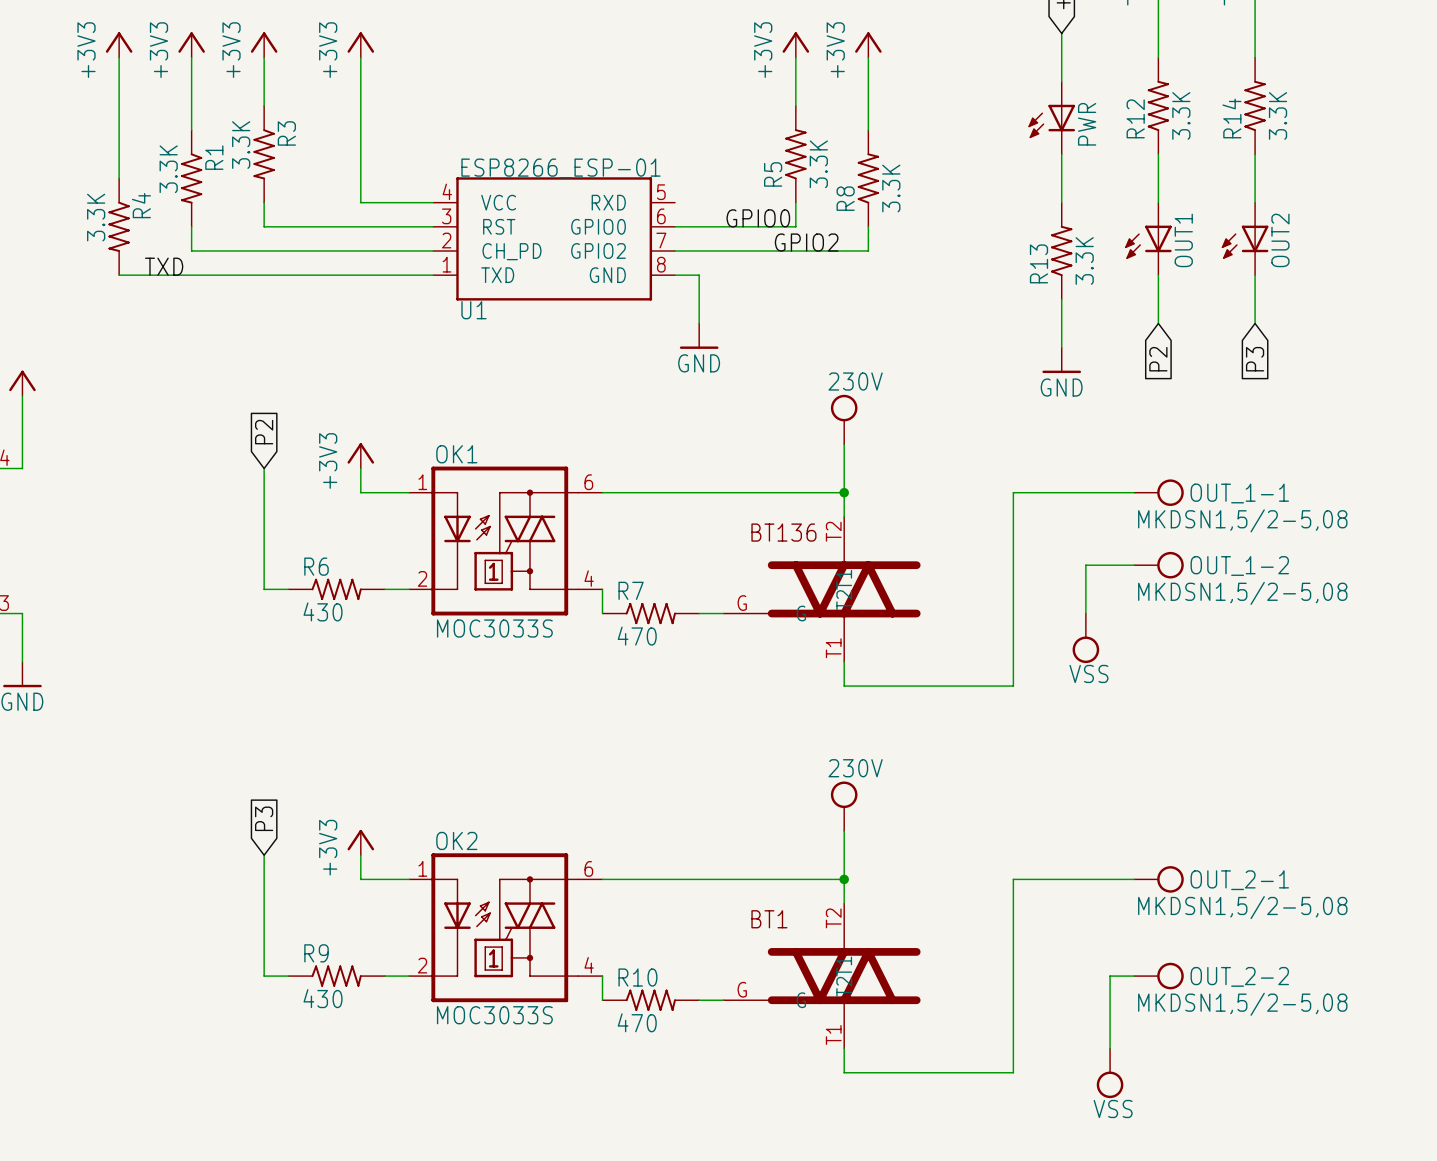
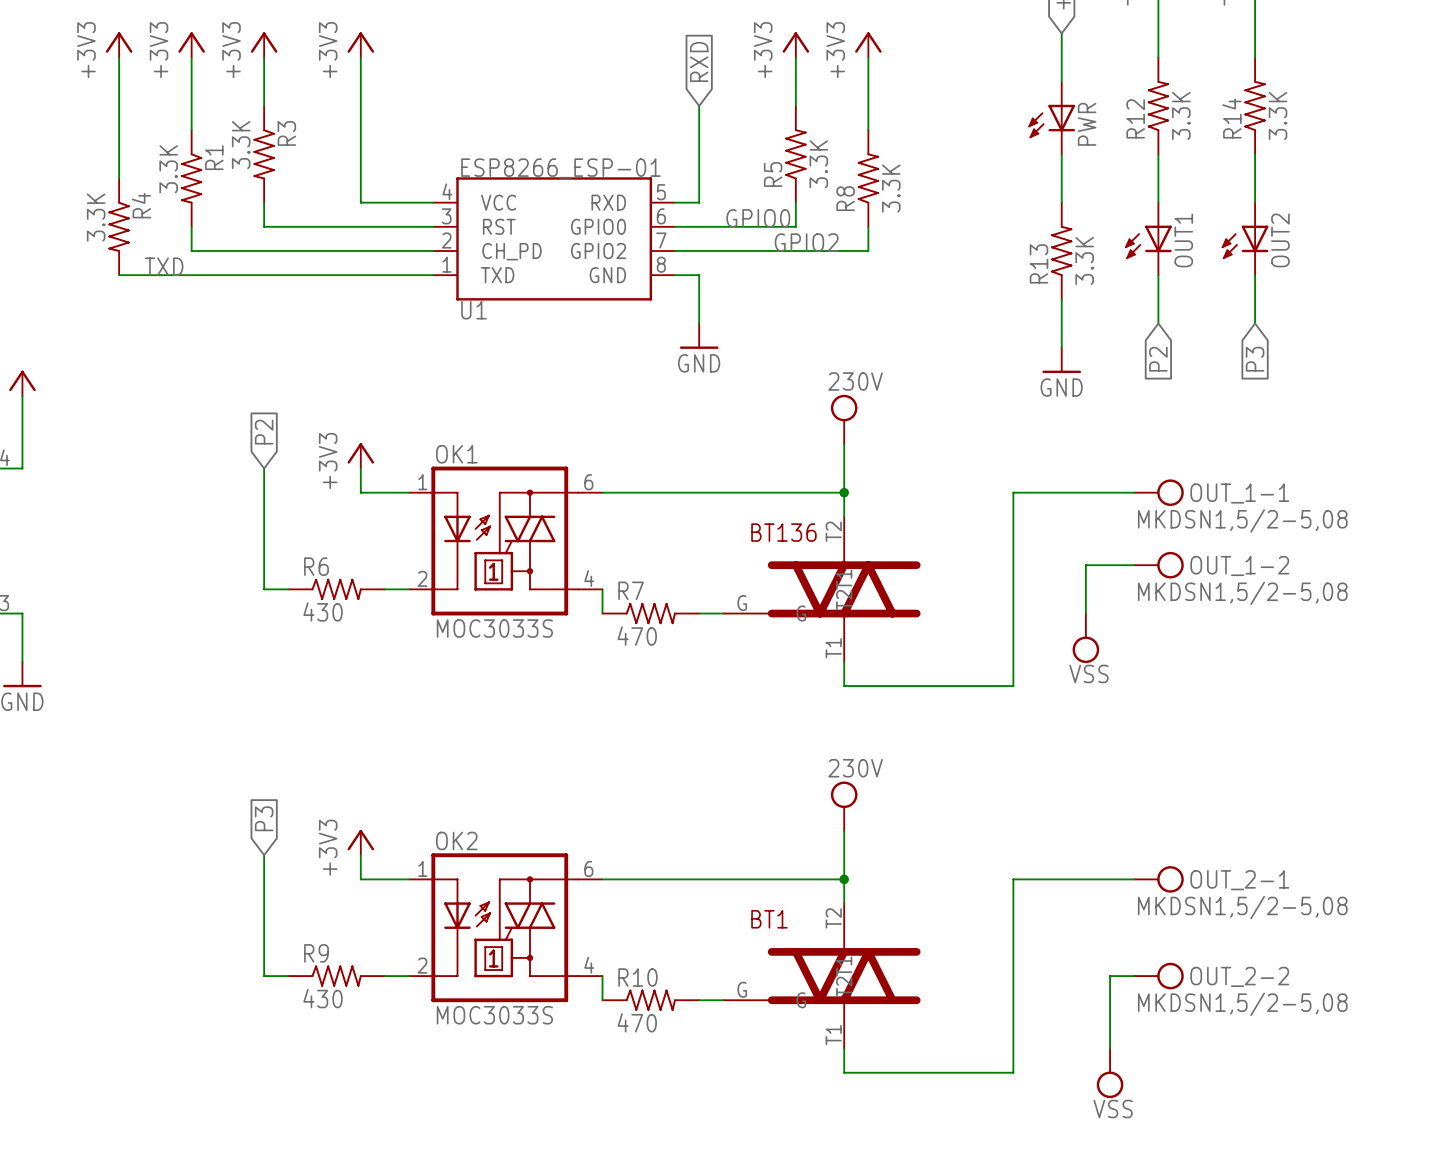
global label: none -> RXD (699, 61)
wire: none -> (699, 105) (699, 202) (675, 202)

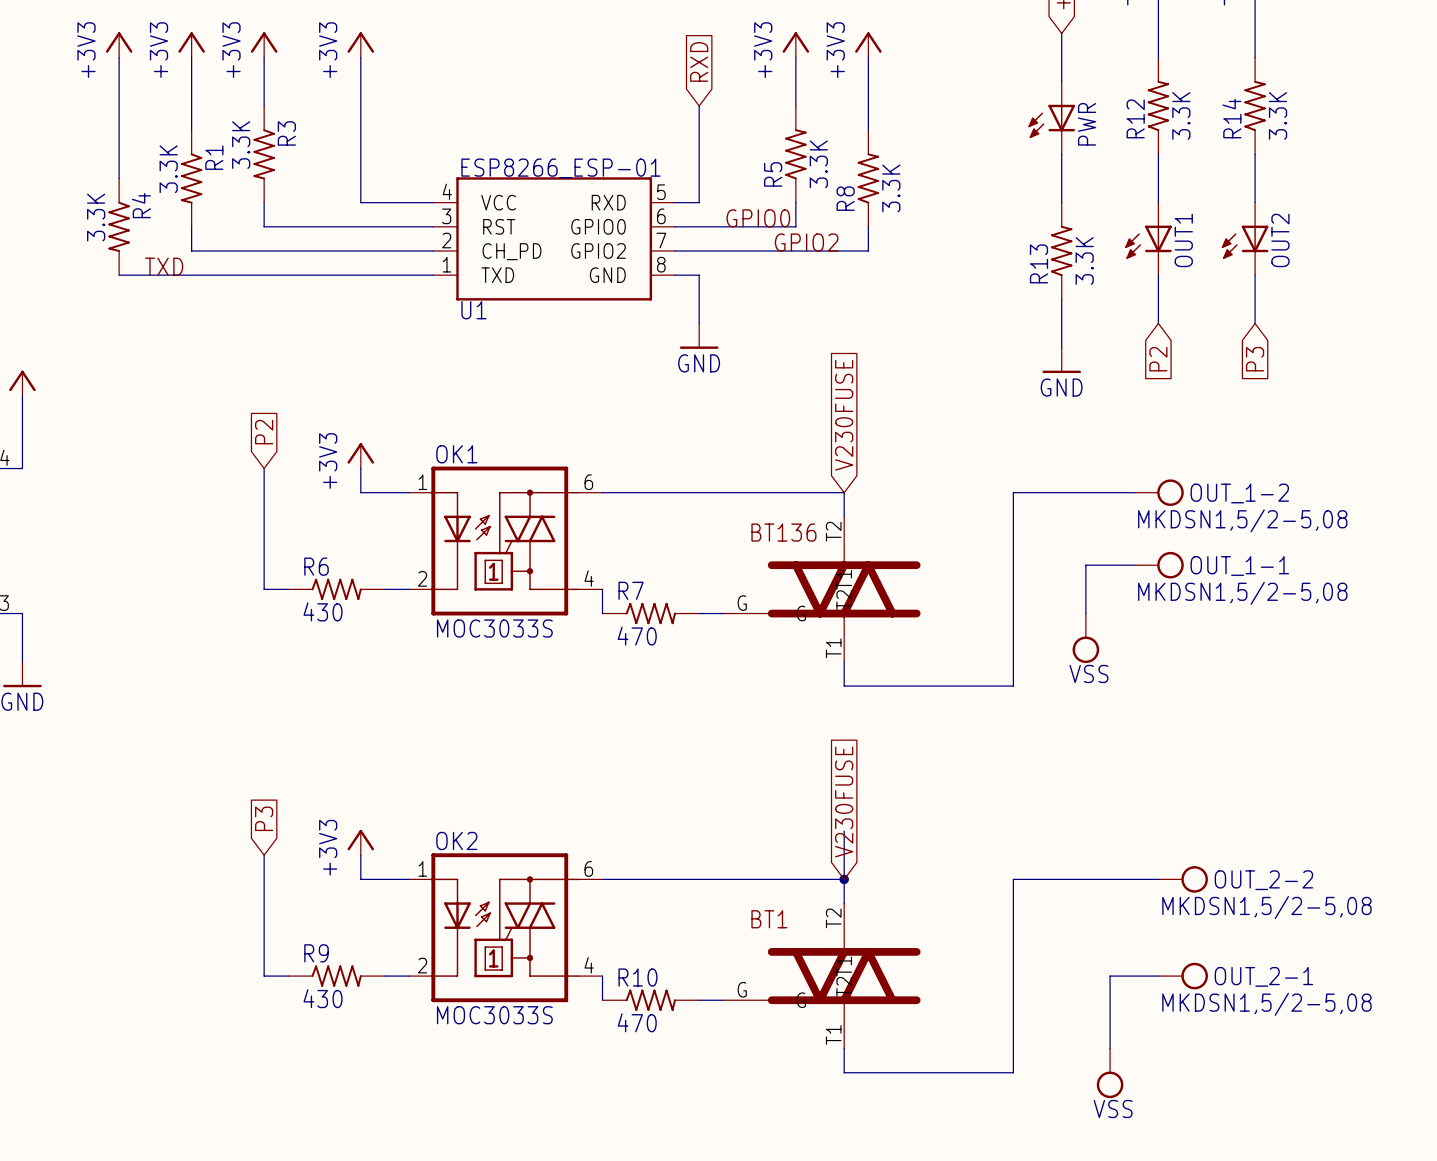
global label: none -> V230FUSE (844, 415)
power symbol: 230V (844, 419) -> none
wire: (844, 444) (844, 492) -> none
junction: (844, 492) -> none
OUT_1-1 name: OUT_1-1 (1239, 493) -> OUT_1-2 (1239, 493)
OUT_1-2 name: OUT_1-2 (1239, 566) -> OUT_1-1 (1239, 566)
global label: none -> V230FUSE (844, 802)
power symbol: 230V (844, 806) -> none
OUT_2-1 position: (1158, 879) -> (1183, 976)
OUT_2-2 position: (1158, 976) -> (1183, 879)

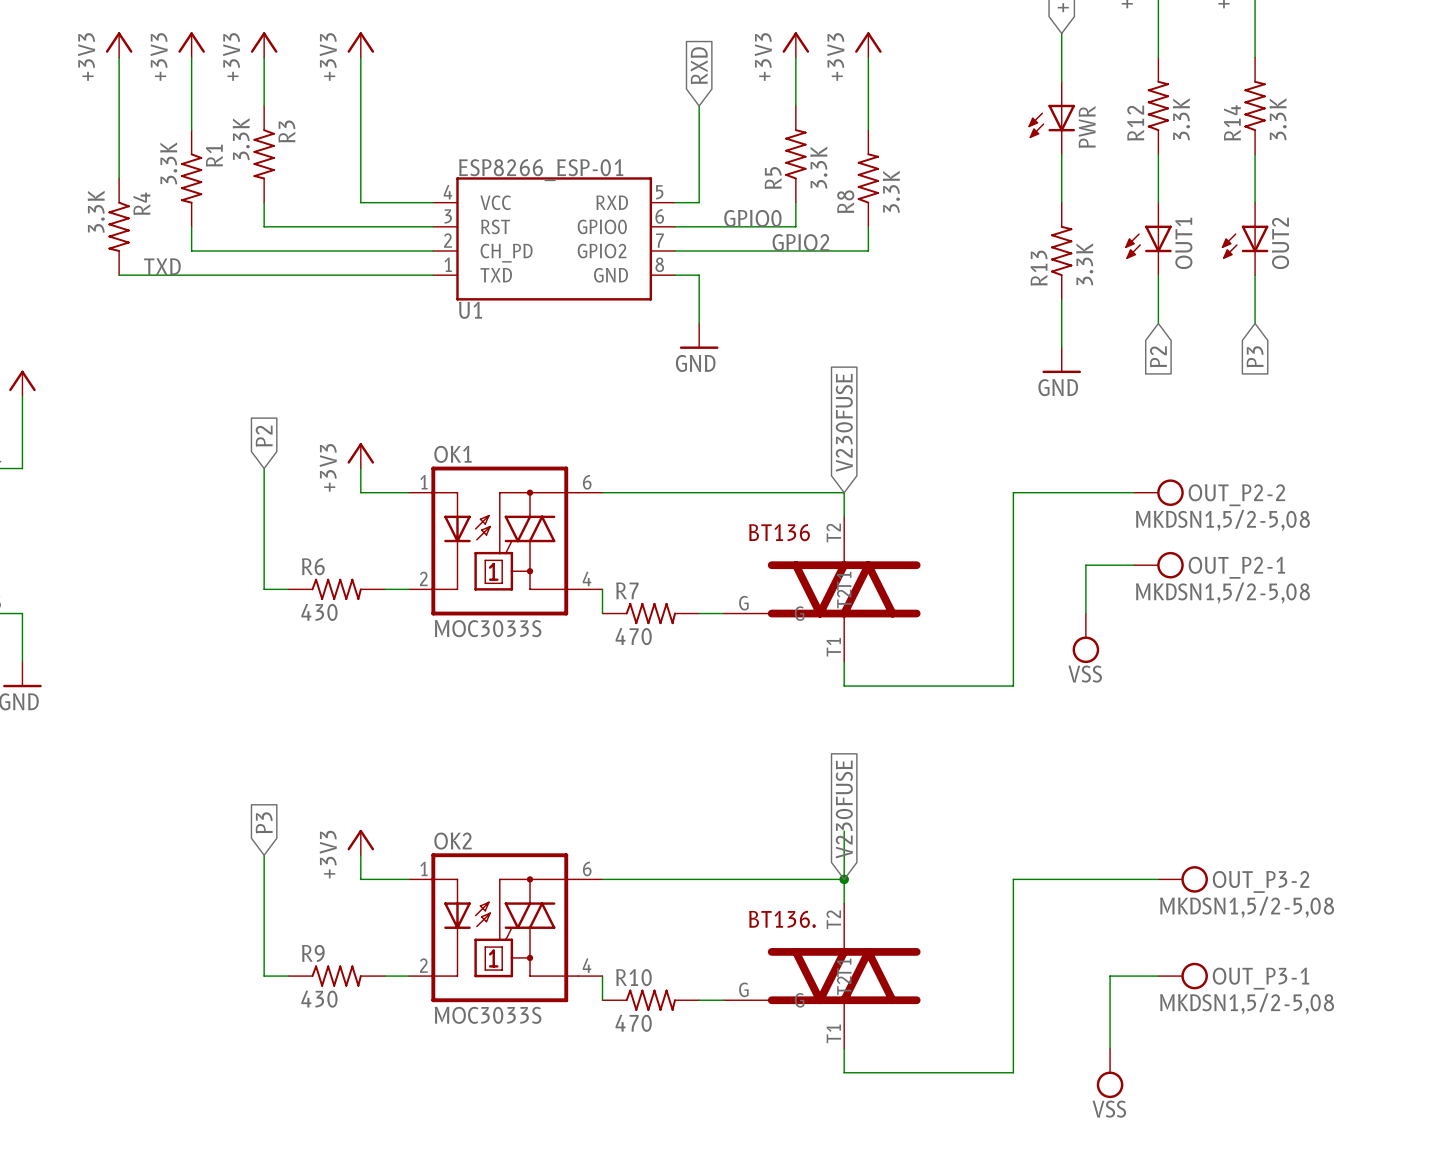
OUT_1-2 name: OUT_1-2 (1239, 493) -> OUT_P2-2 (1236, 495)
OUT_1-1 name: OUT_1-1 (1239, 566) -> OUT_P2-1 (1236, 567)
OUT_2-2 name: OUT_2-2 (1263, 880) -> OUT_P3-2 (1261, 881)
BT1 name: BT1 (769, 919) -> BT136. (782, 919)
OUT_2-1 name: OUT_2-1 (1263, 976) -> OUT_P3-1 (1261, 978)

